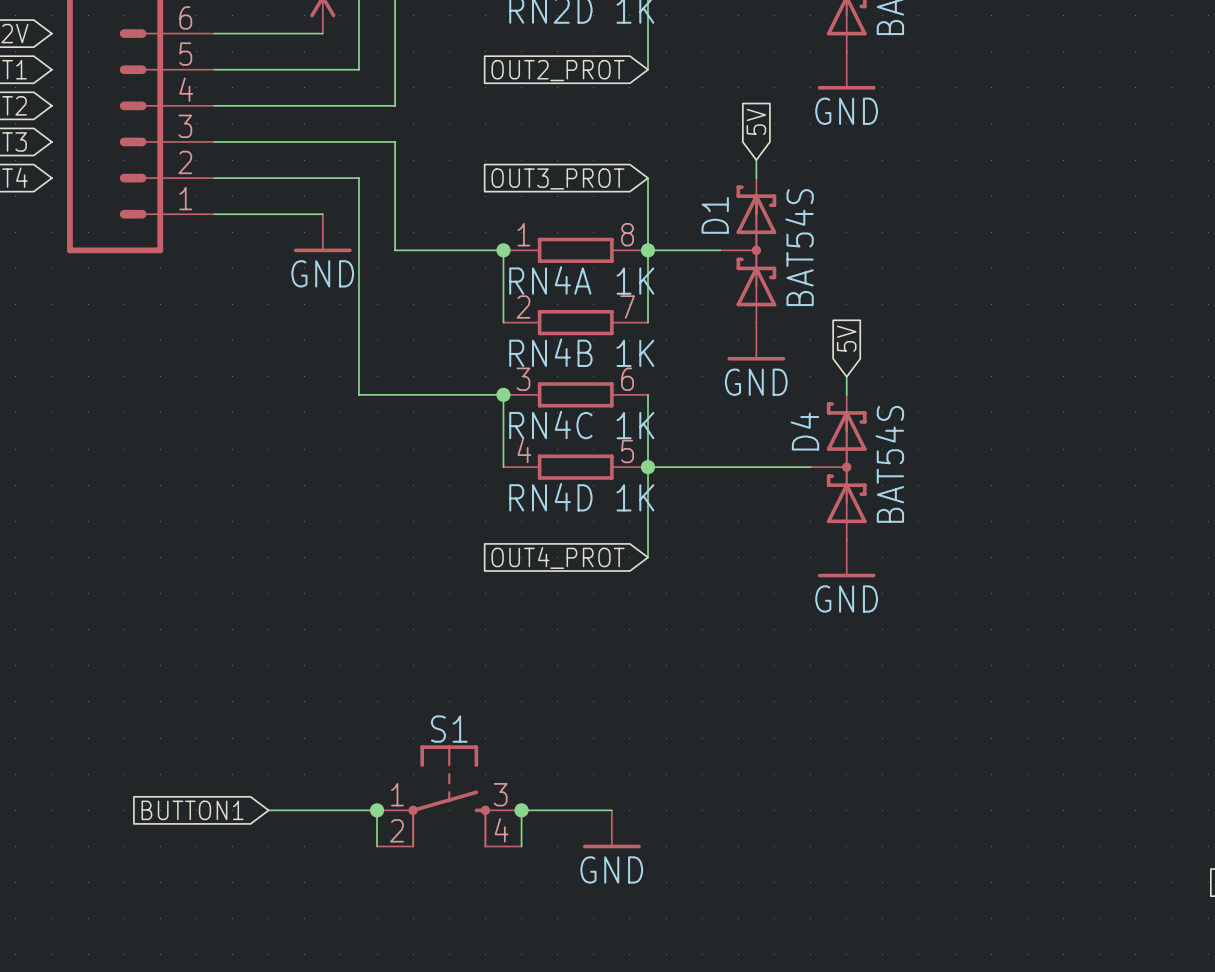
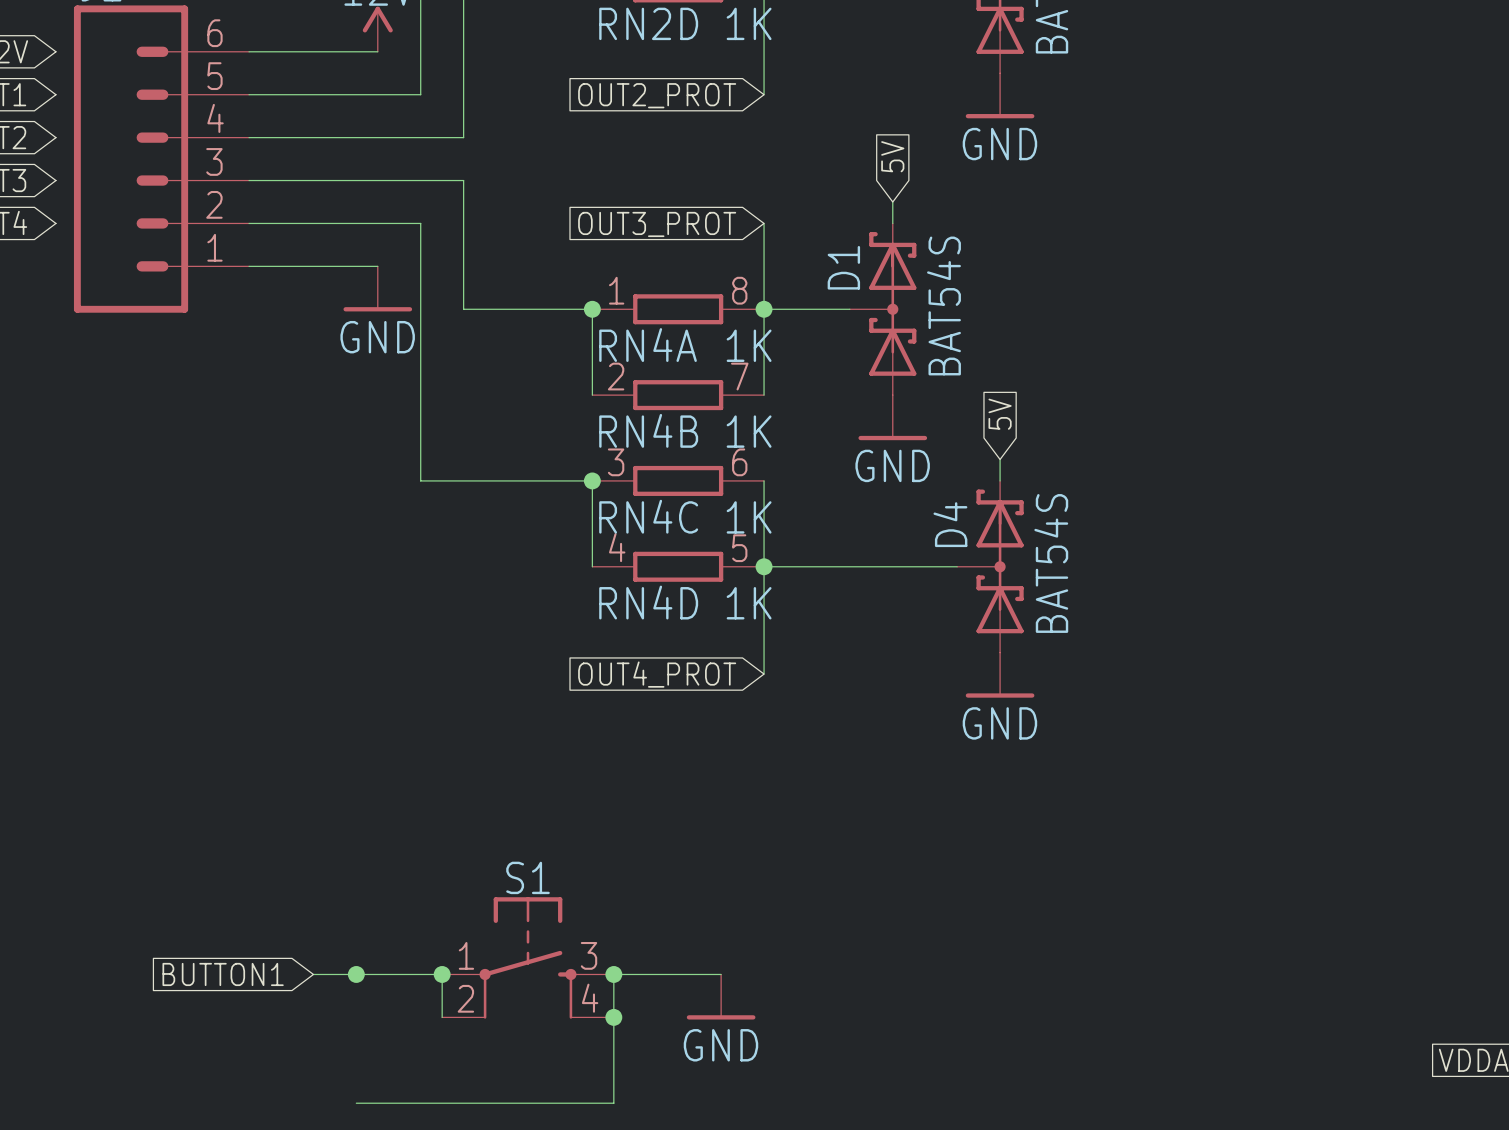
junction: none -> (356, 974)
wire: none -> (613, 1017) (613, 1103) (356, 1103)
junction: none -> (613, 1017)

